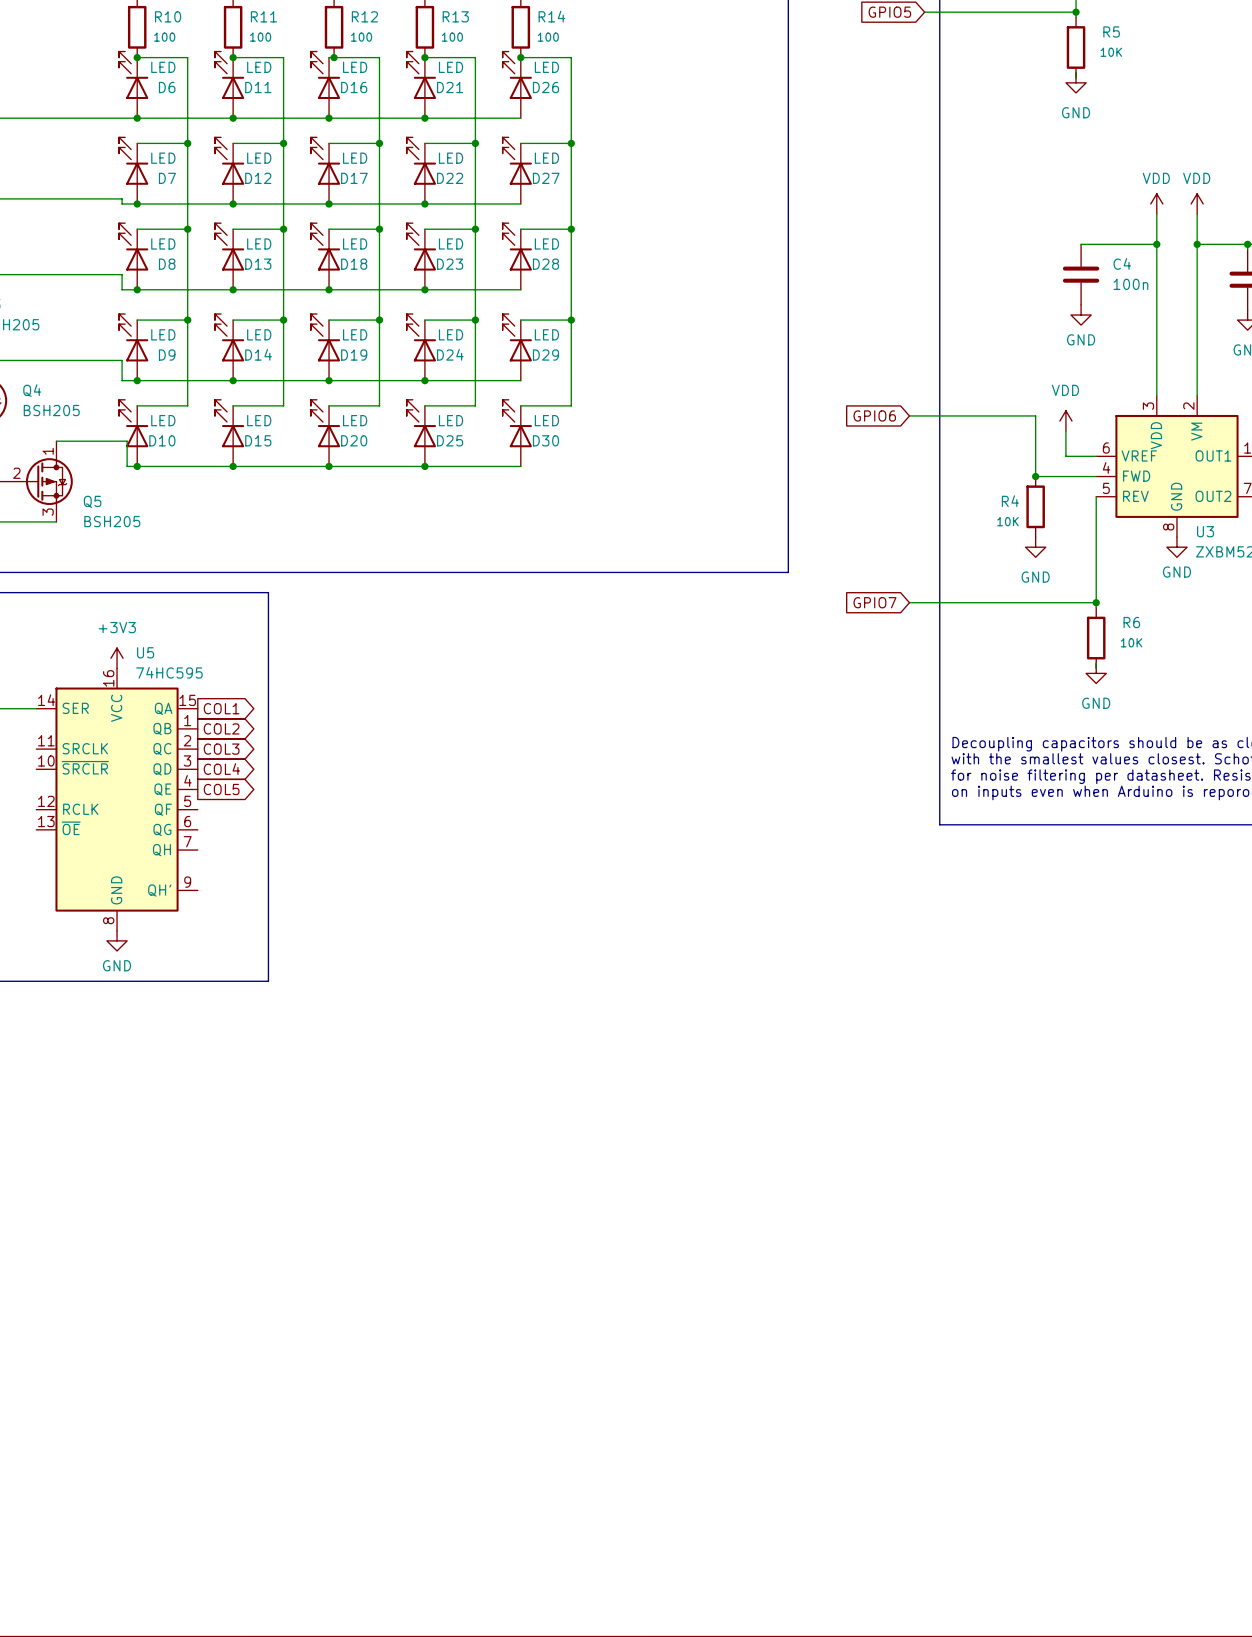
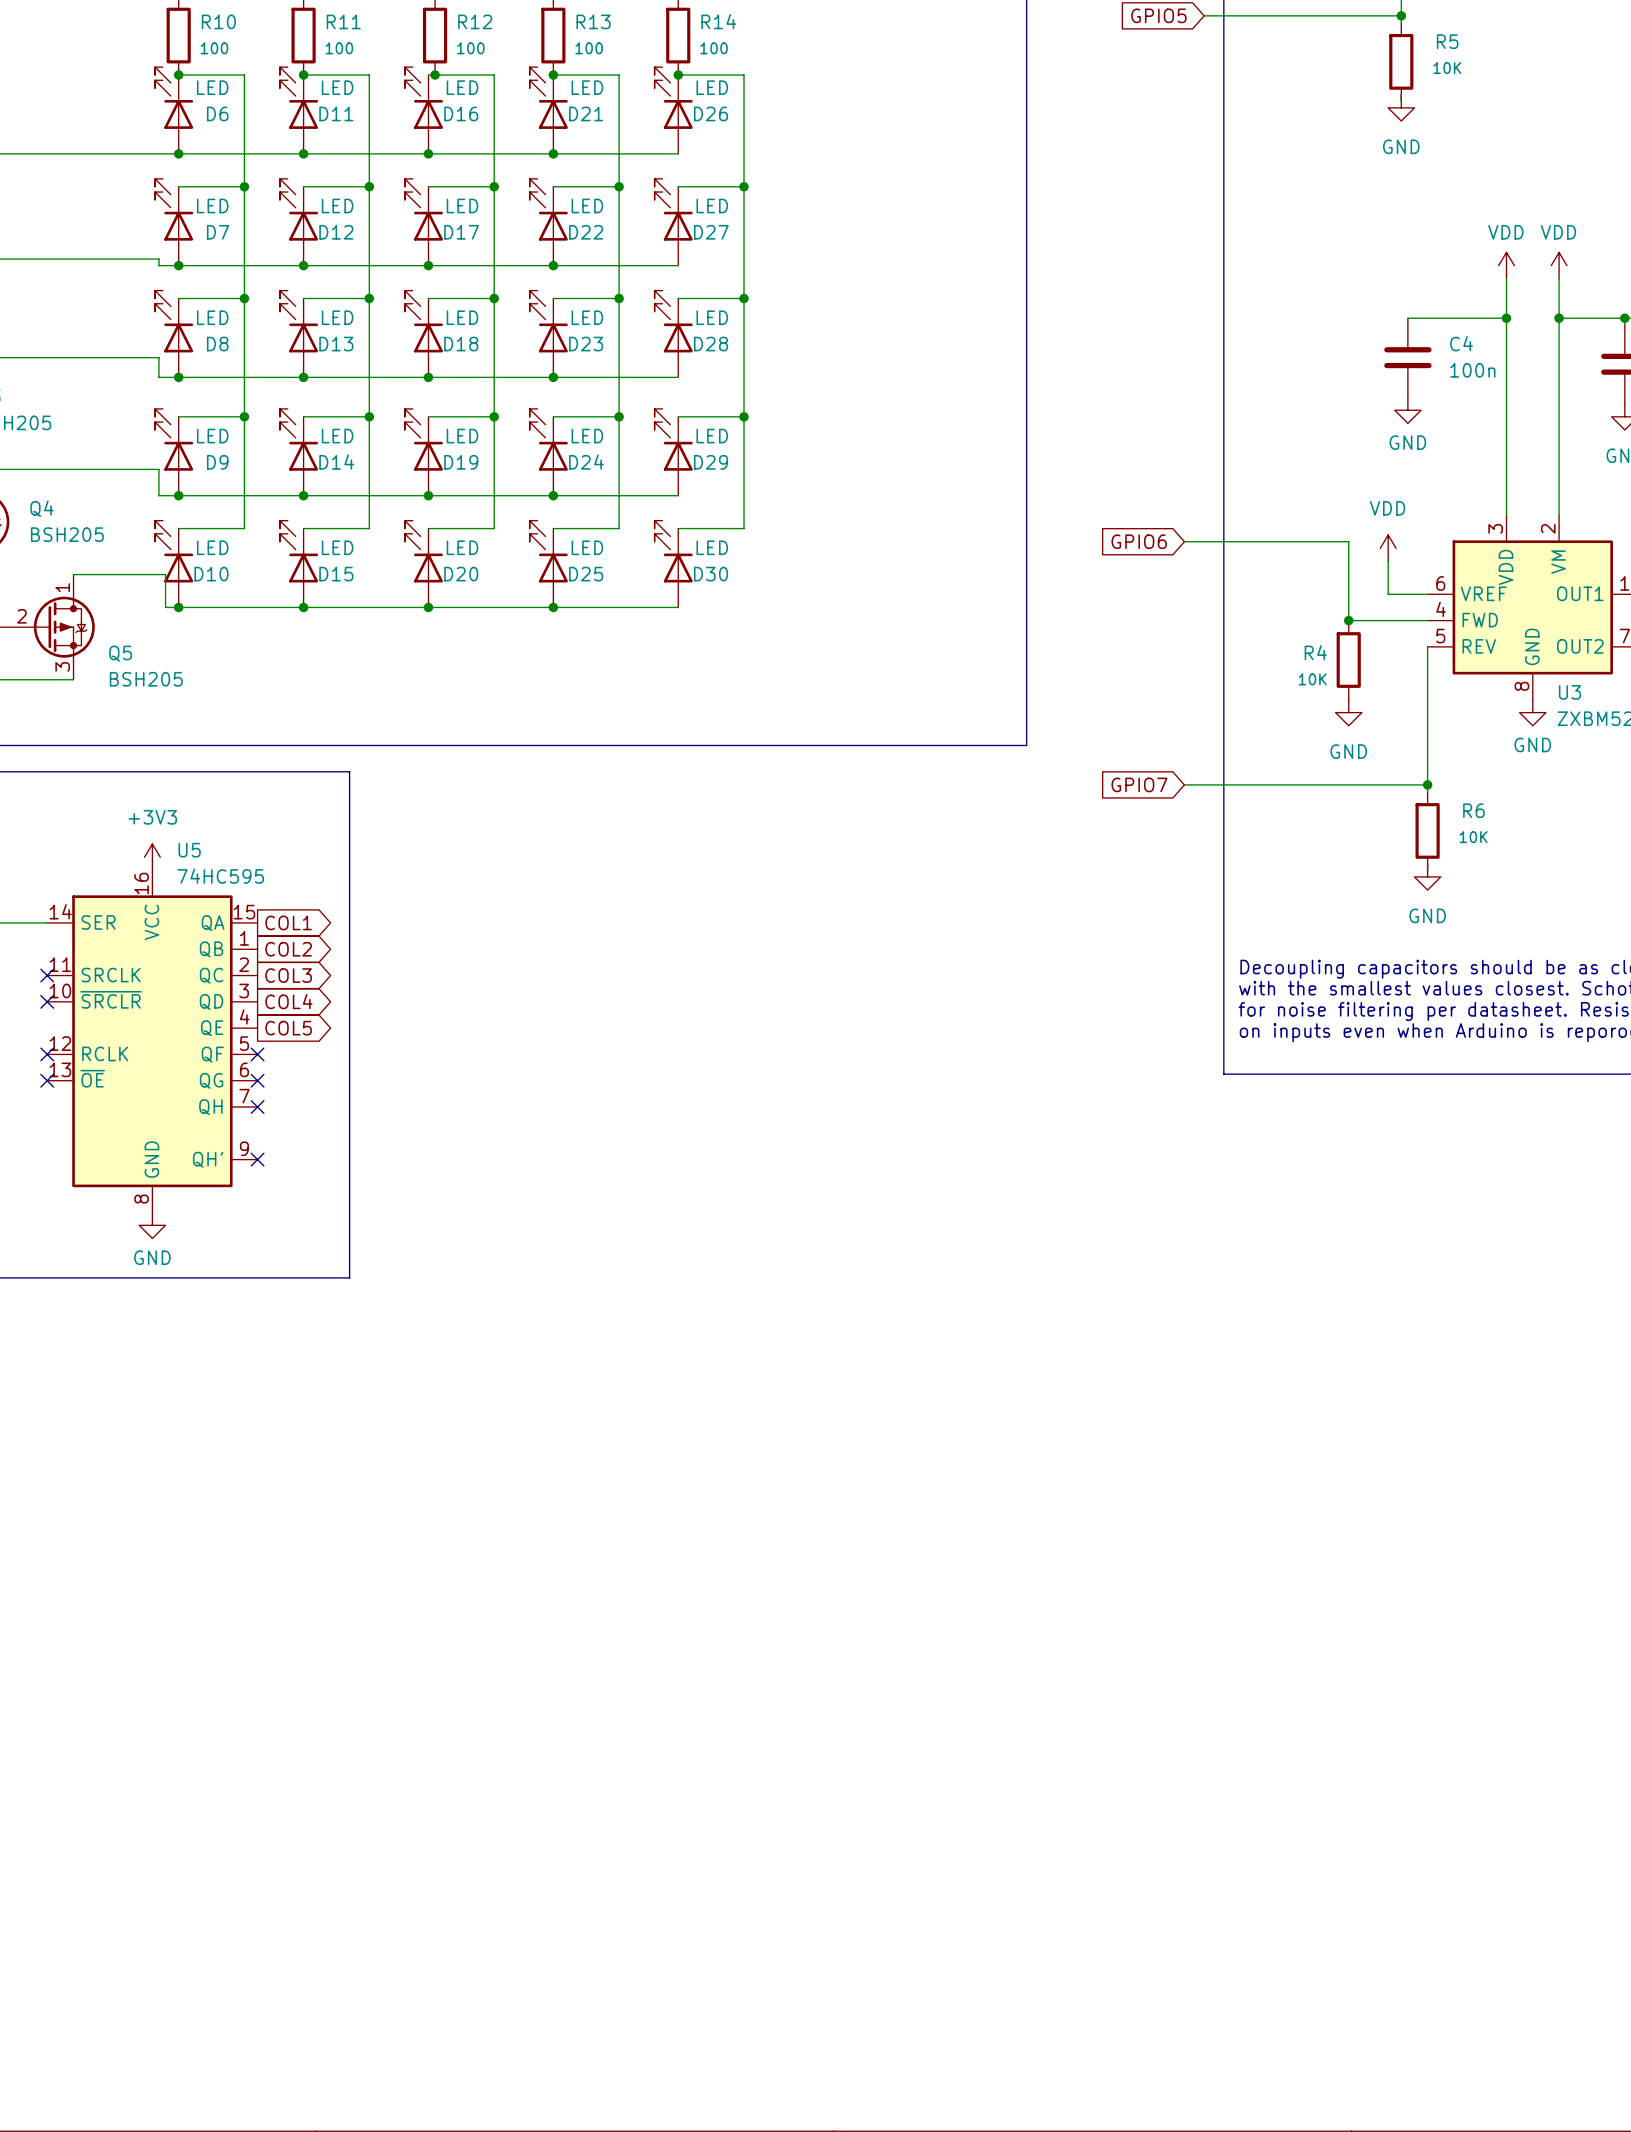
no-connect mark: none -> (47, 975)
no-connect mark: none -> (47, 1001)
no-connect mark: none -> (47, 1054)
no-connect mark: none -> (257, 1054)
no-connect mark: none -> (47, 1080)
no-connect mark: none -> (257, 1080)
no-connect mark: none -> (257, 1107)
no-connect mark: none -> (257, 1159)

